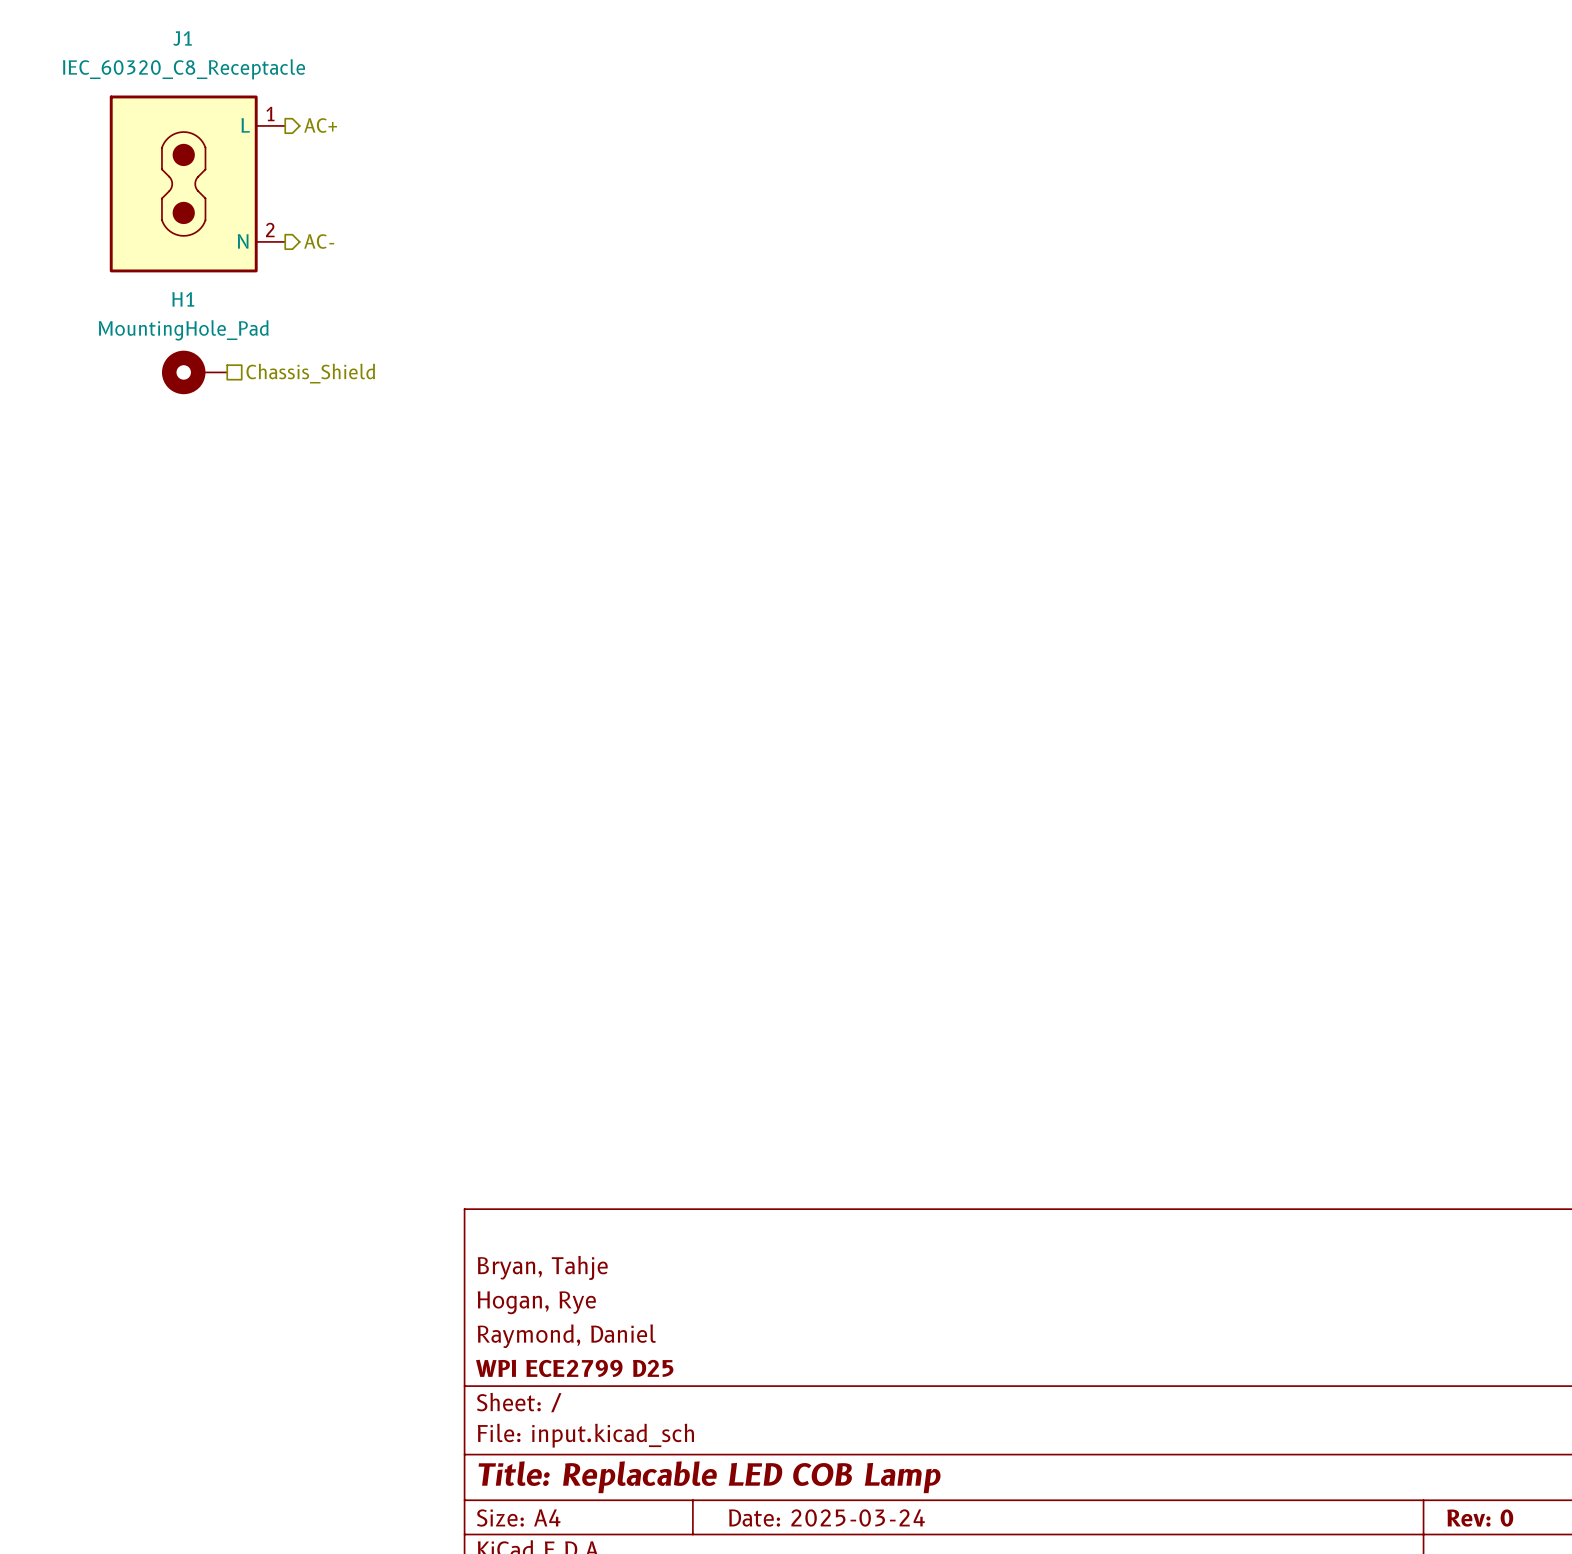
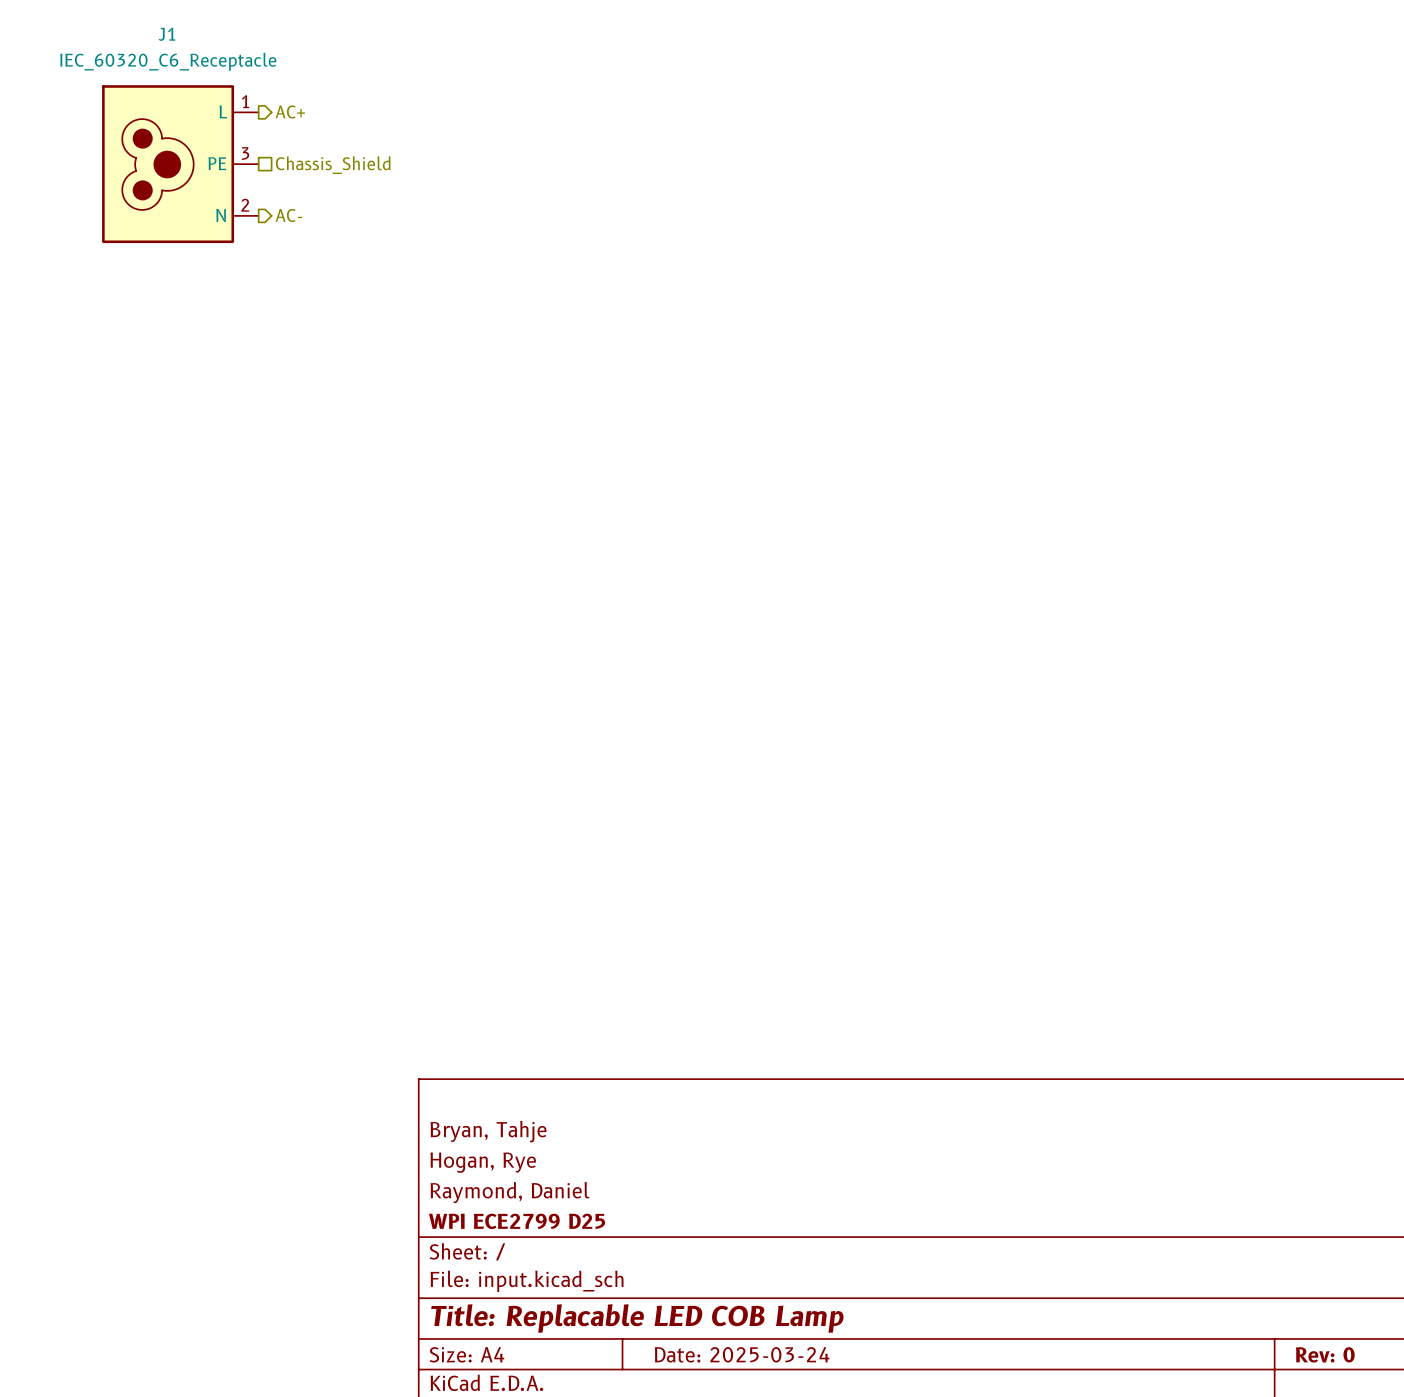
J1 value: IEC_60320_C8_Receptacle (183, 69) -> IEC_60320_C6_Receptacle (168, 61)
J1 symbol: [109, 95, 286, 273] -> [102, 85, 259, 244]
H1: MountingHole_Pad (194, 372) -> none
hierarchical label position: Chassis_Shield (310, 373) -> Chassis_Shield (333, 165)

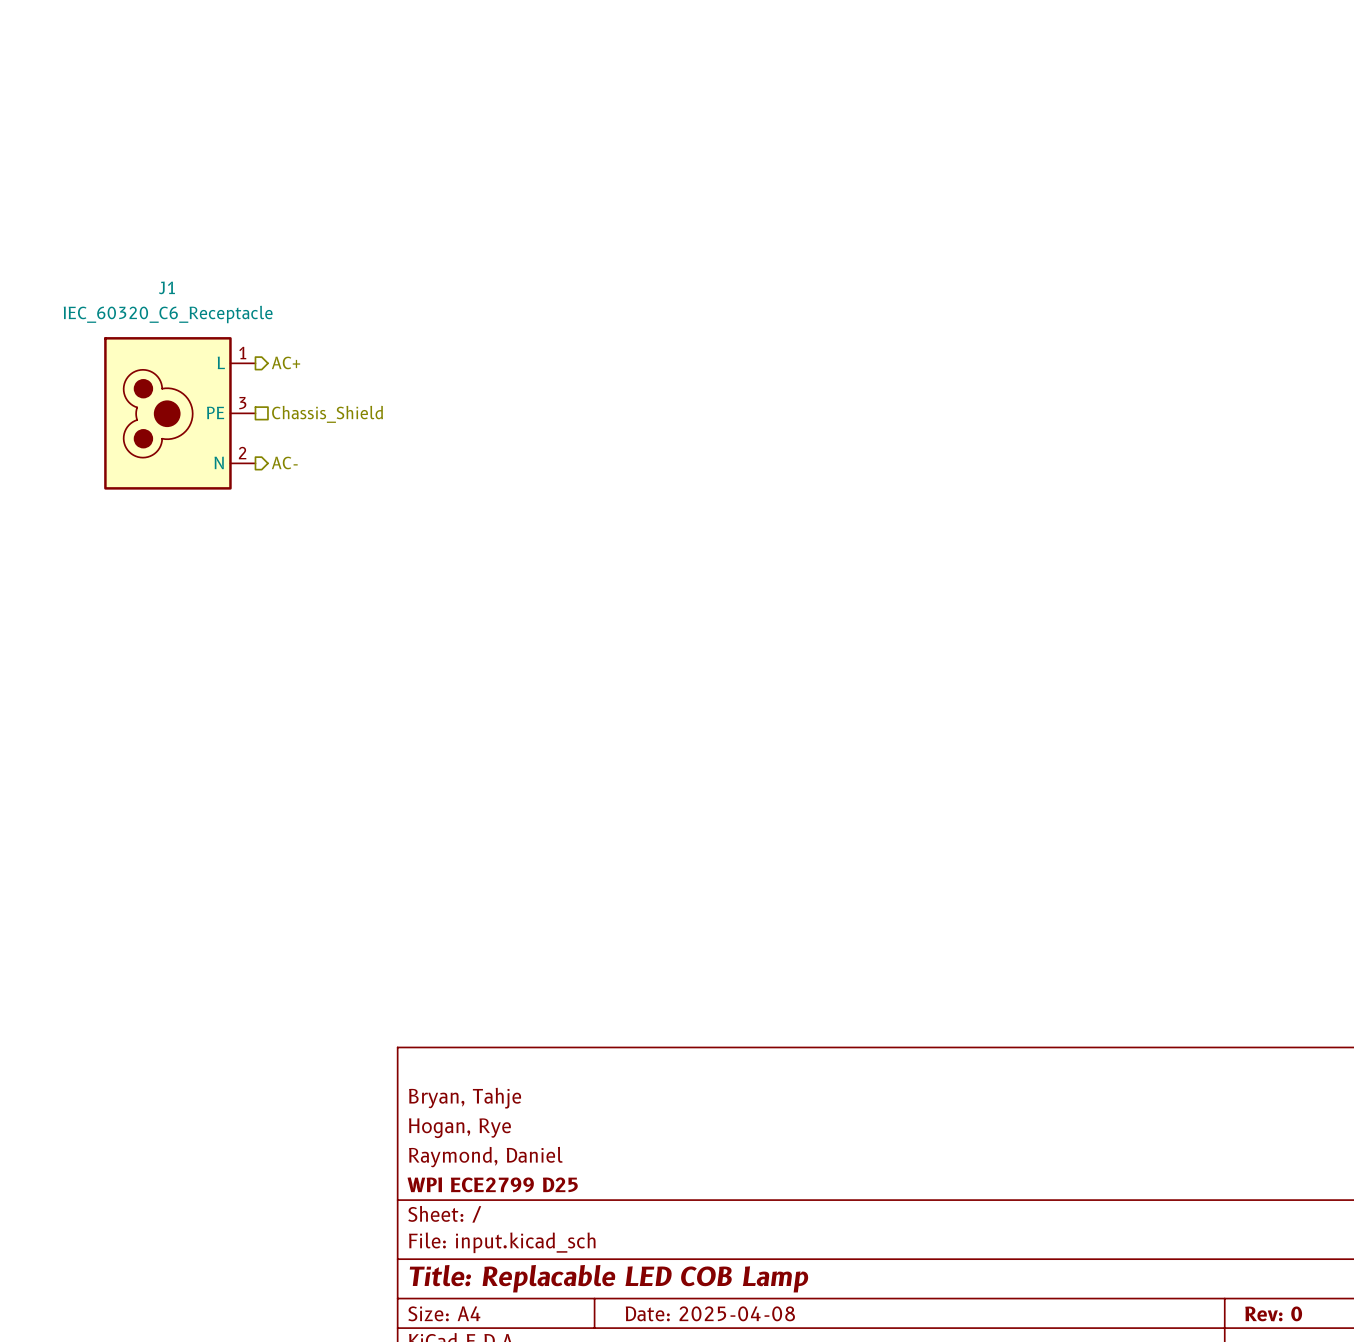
hierarchical label: AC+ (290, 111) -> none
J1 position: (180, 164) -> (179, 413)
hierarchical label: Chassis_Shield (333, 165) -> none
hierarchical label: AC- (288, 215) -> none
hierarchical label: none -> AC+ (286, 362)
hierarchical label: none -> Chassis_Shield (327, 414)
hierarchical label: none -> AC- (284, 462)
title block: Date: 2025-03-24 (742, 1354) -> Date: 2025-04-08 (710, 1313)

